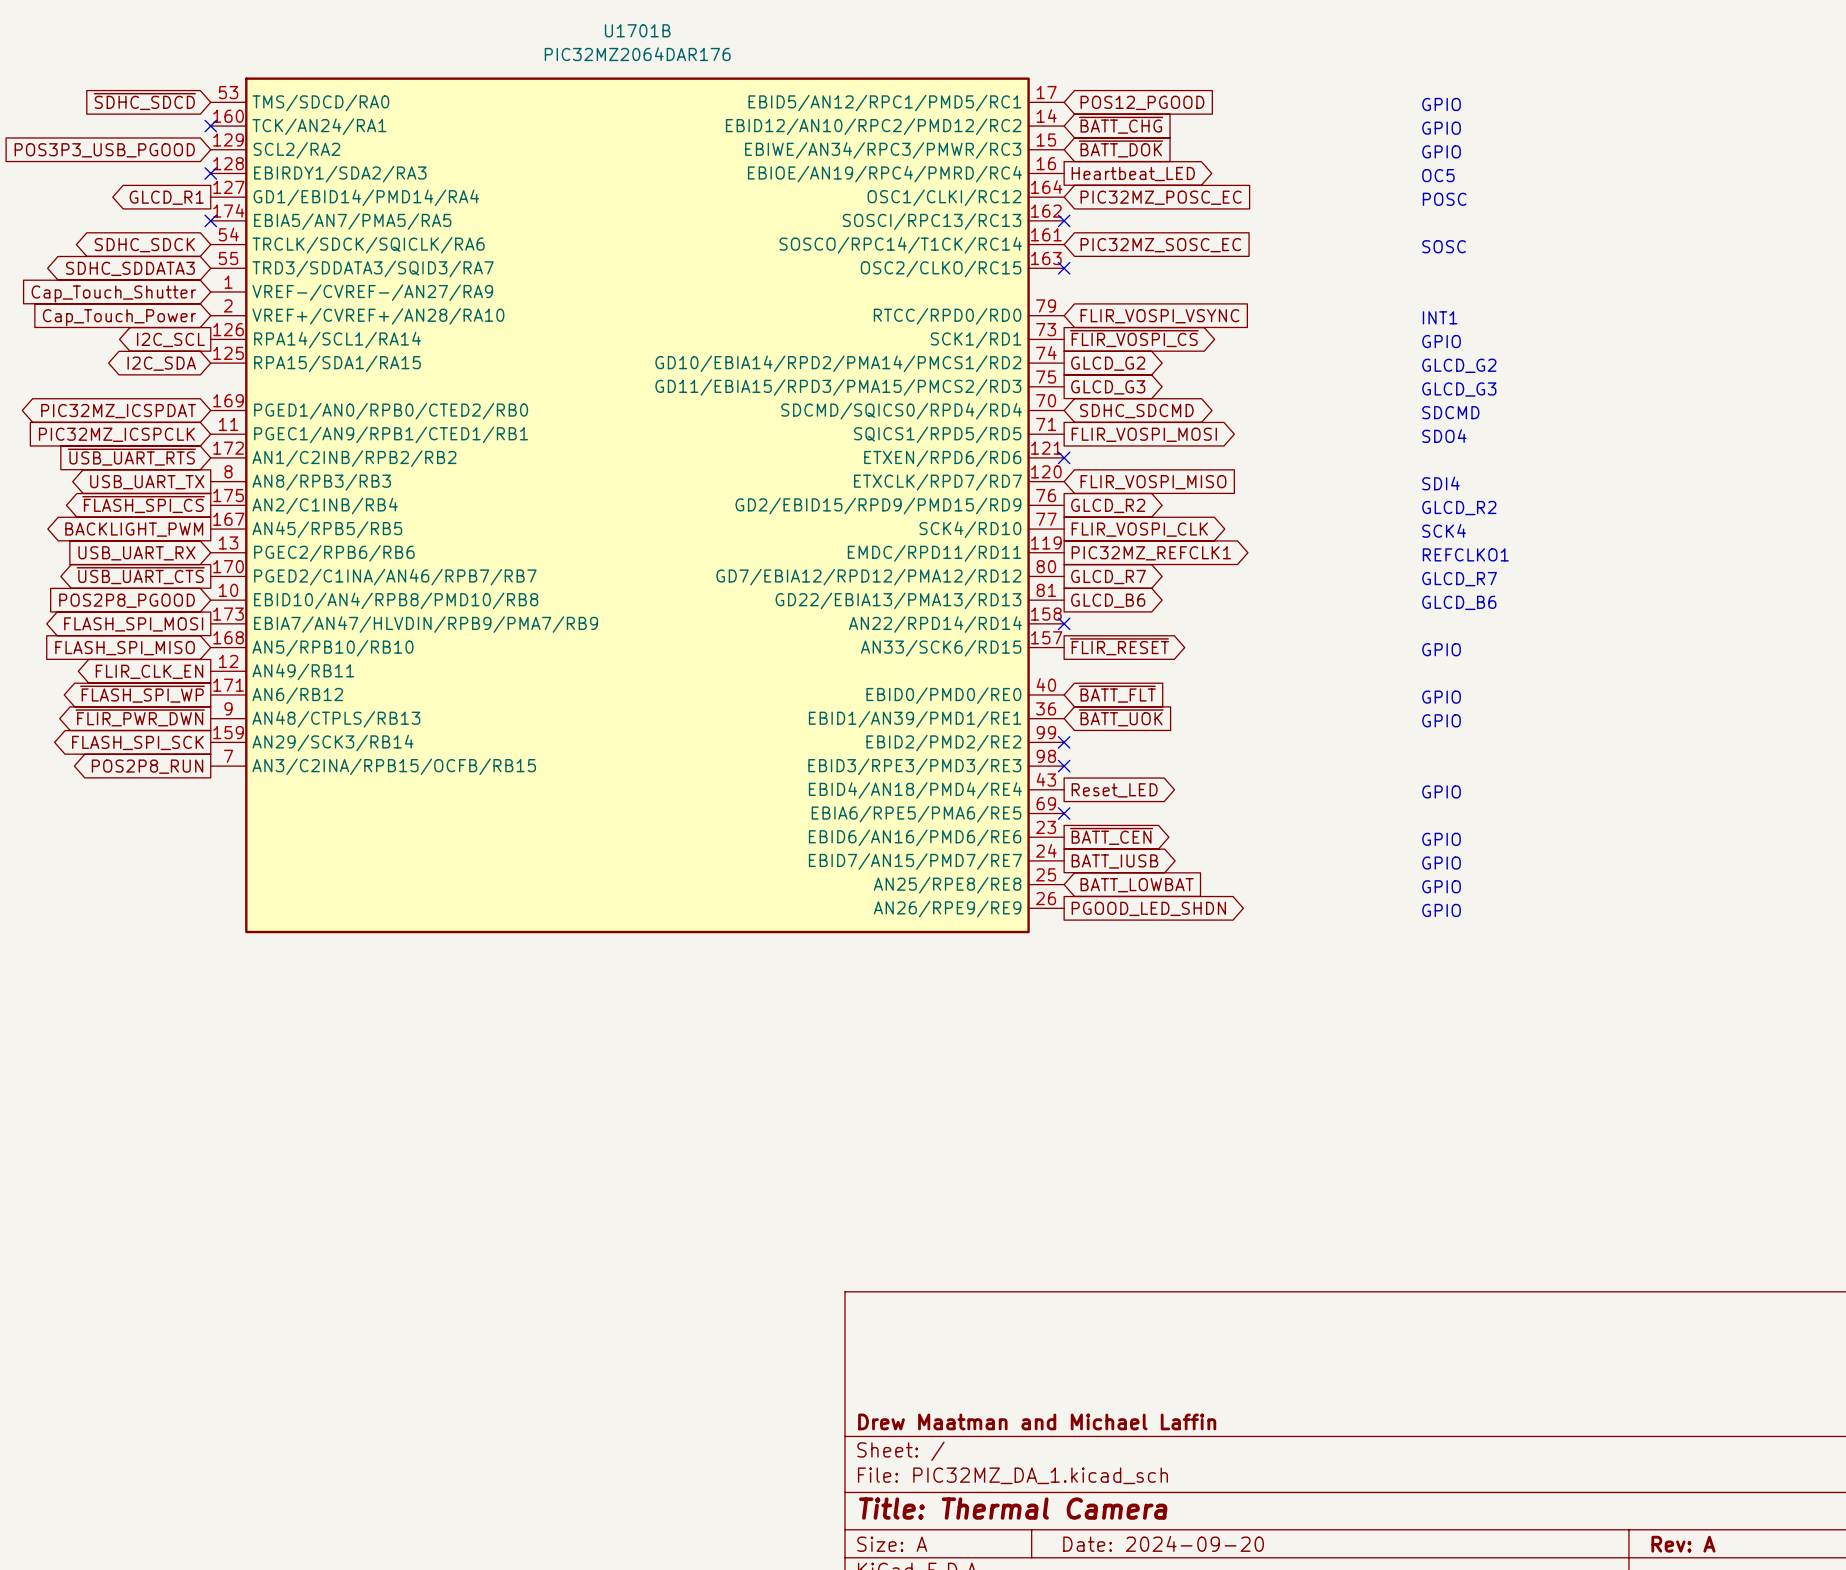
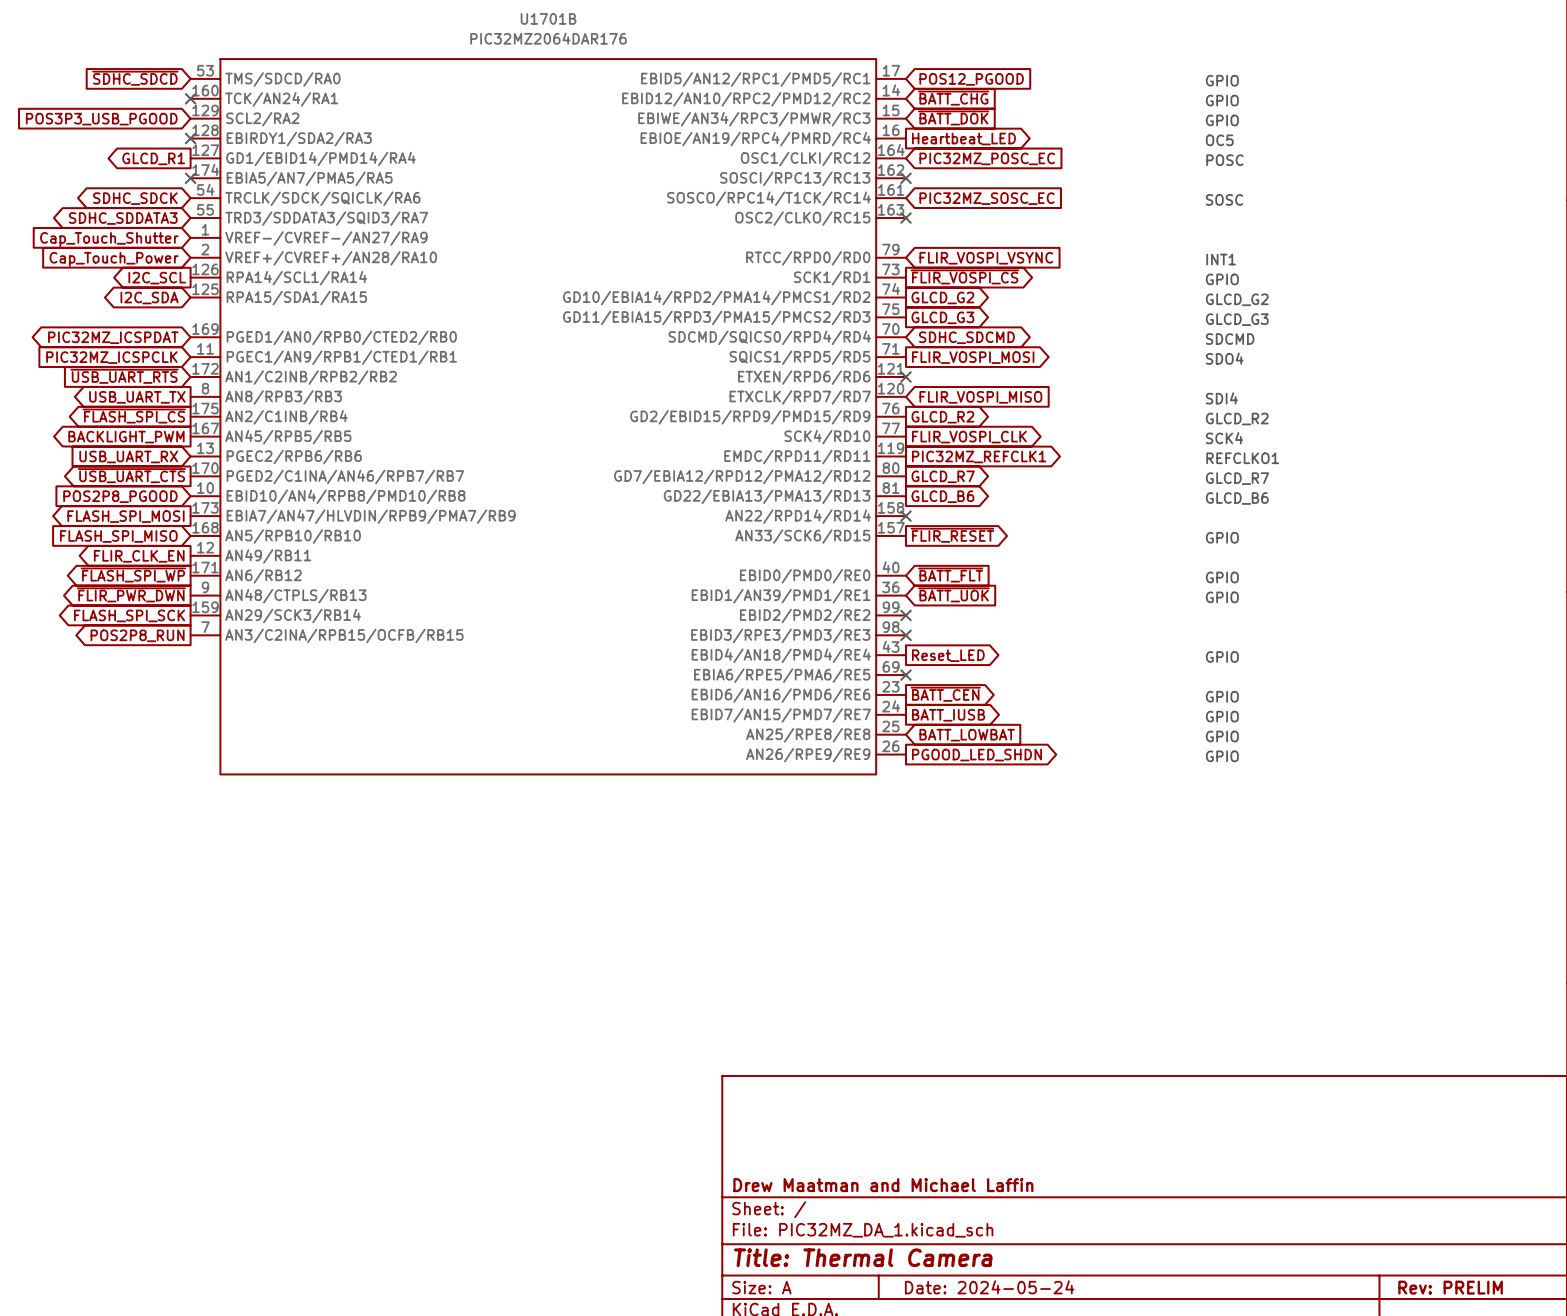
title block: Date: 2024-09-20 (1163, 1543) -> Date: 2024-05-24 (989, 1287)
title block: Rev: A (1683, 1544) -> Rev: PRELIM (1450, 1287)

